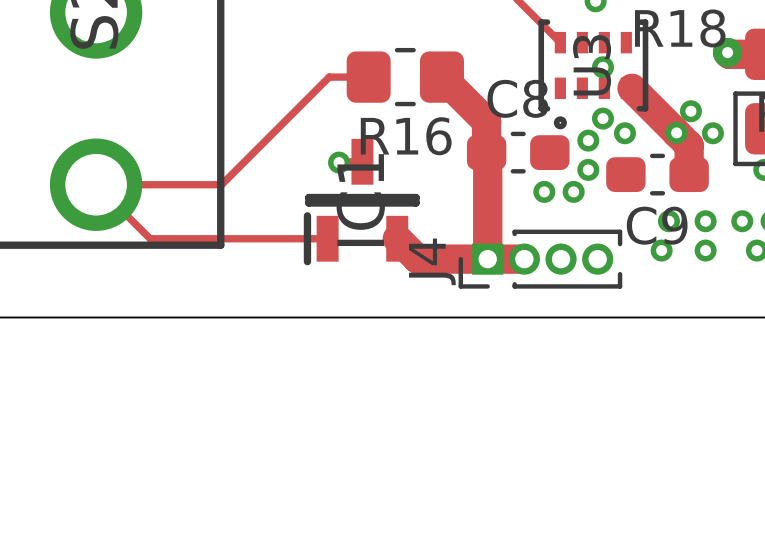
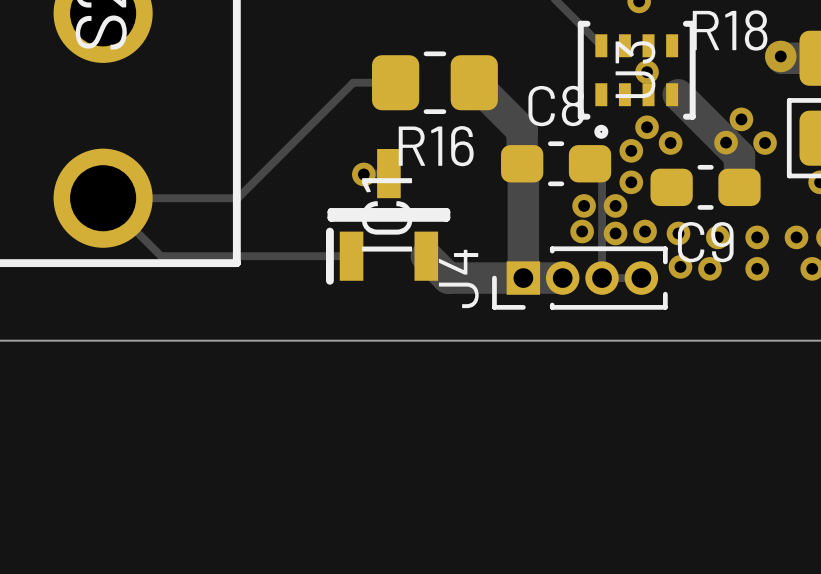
track: none -> (590, 163) (602, 175) (602, 278) (641, 278)
via: none -> (582, 231)
via: none -> (645, 231)
via: none -> (615, 233)
via: none -> (678, 233)
via: none -> (680, 266)

